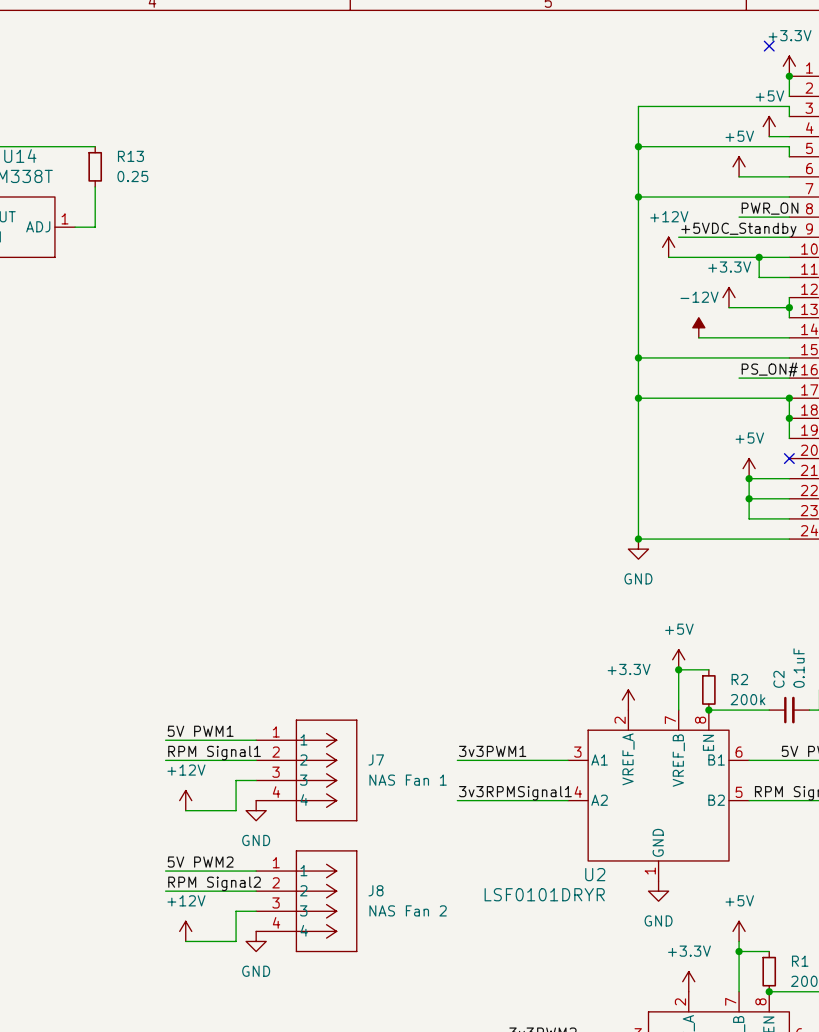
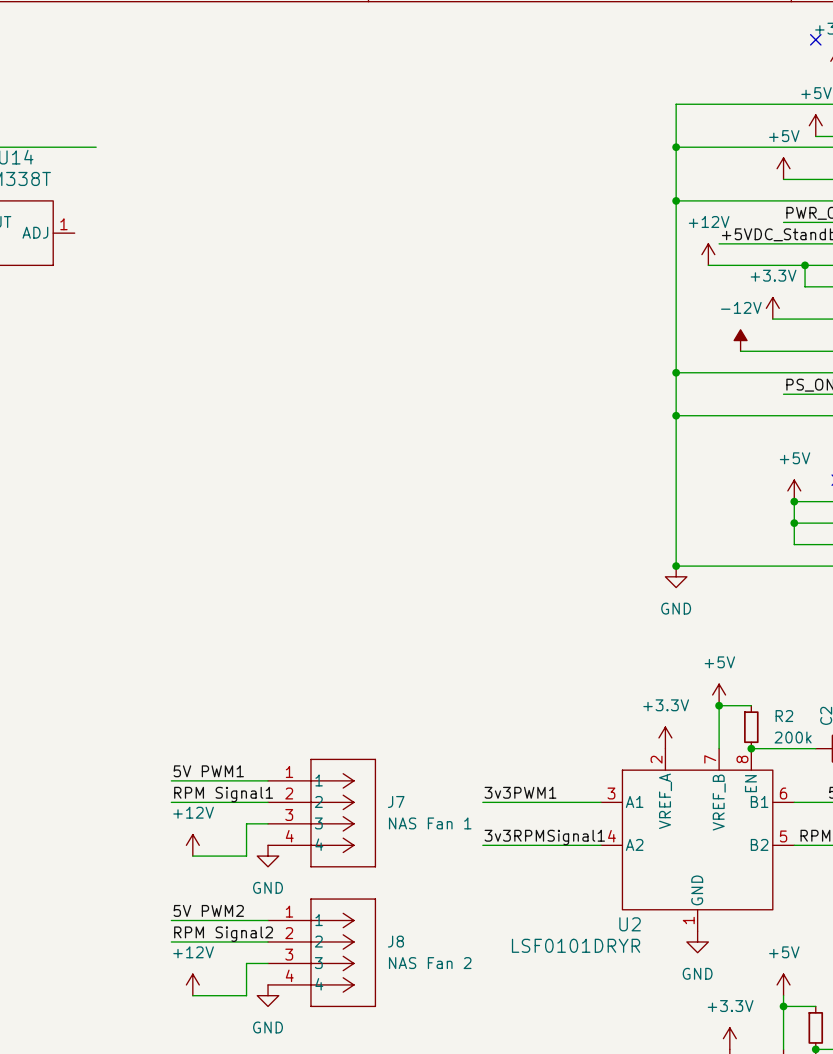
R13: 0.25 (95, 166) -> none
wire: (95, 186) (95, 227) (75, 227) -> none

